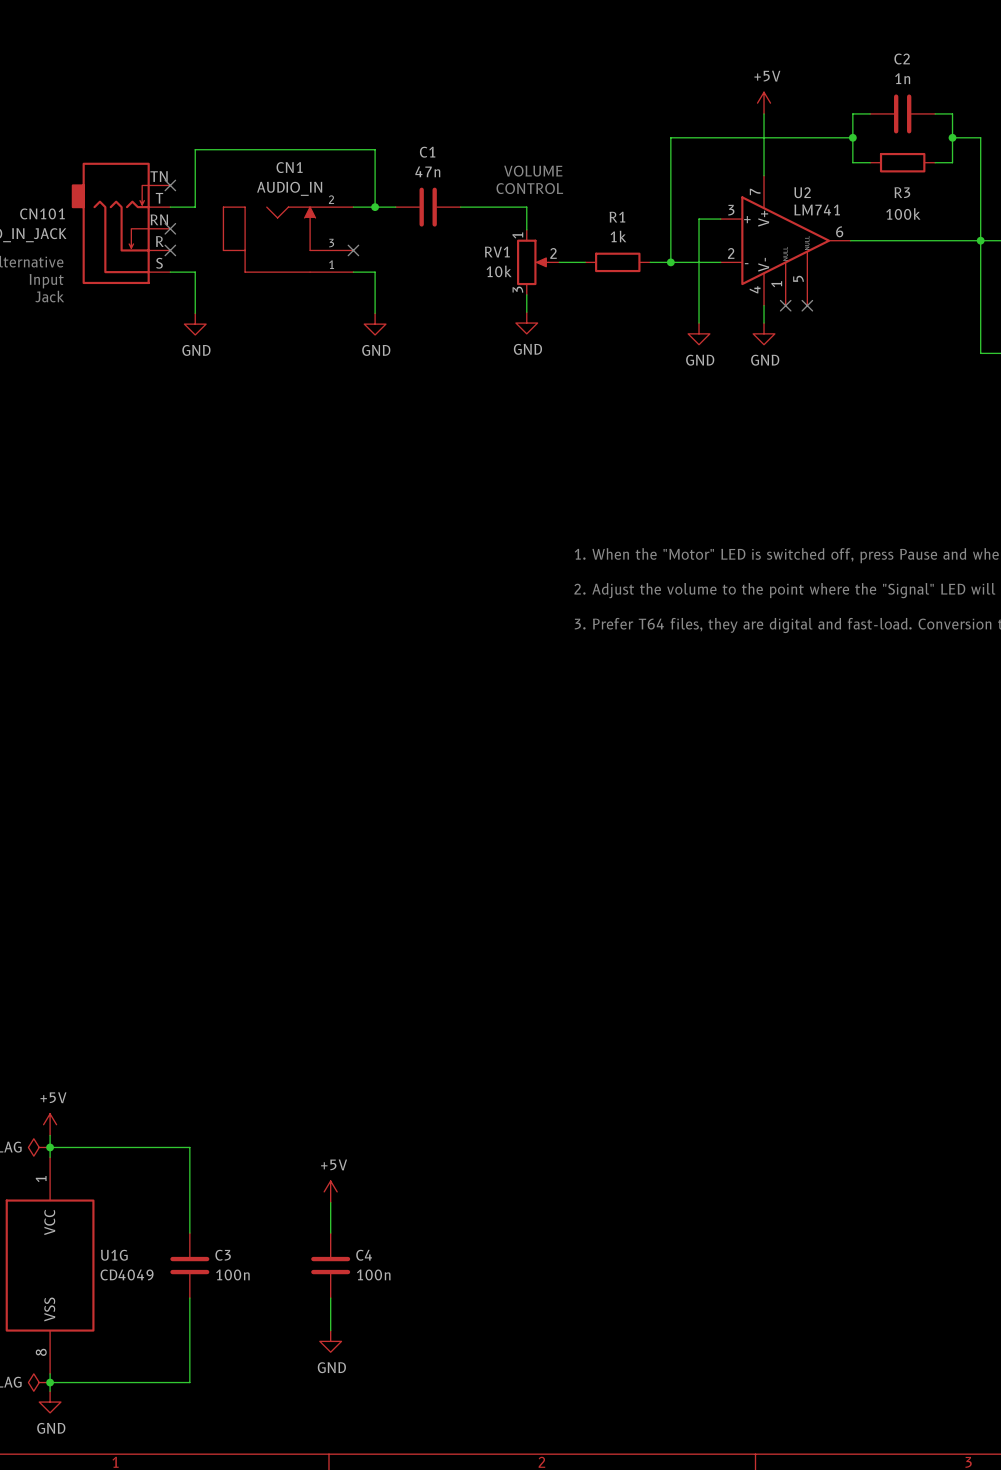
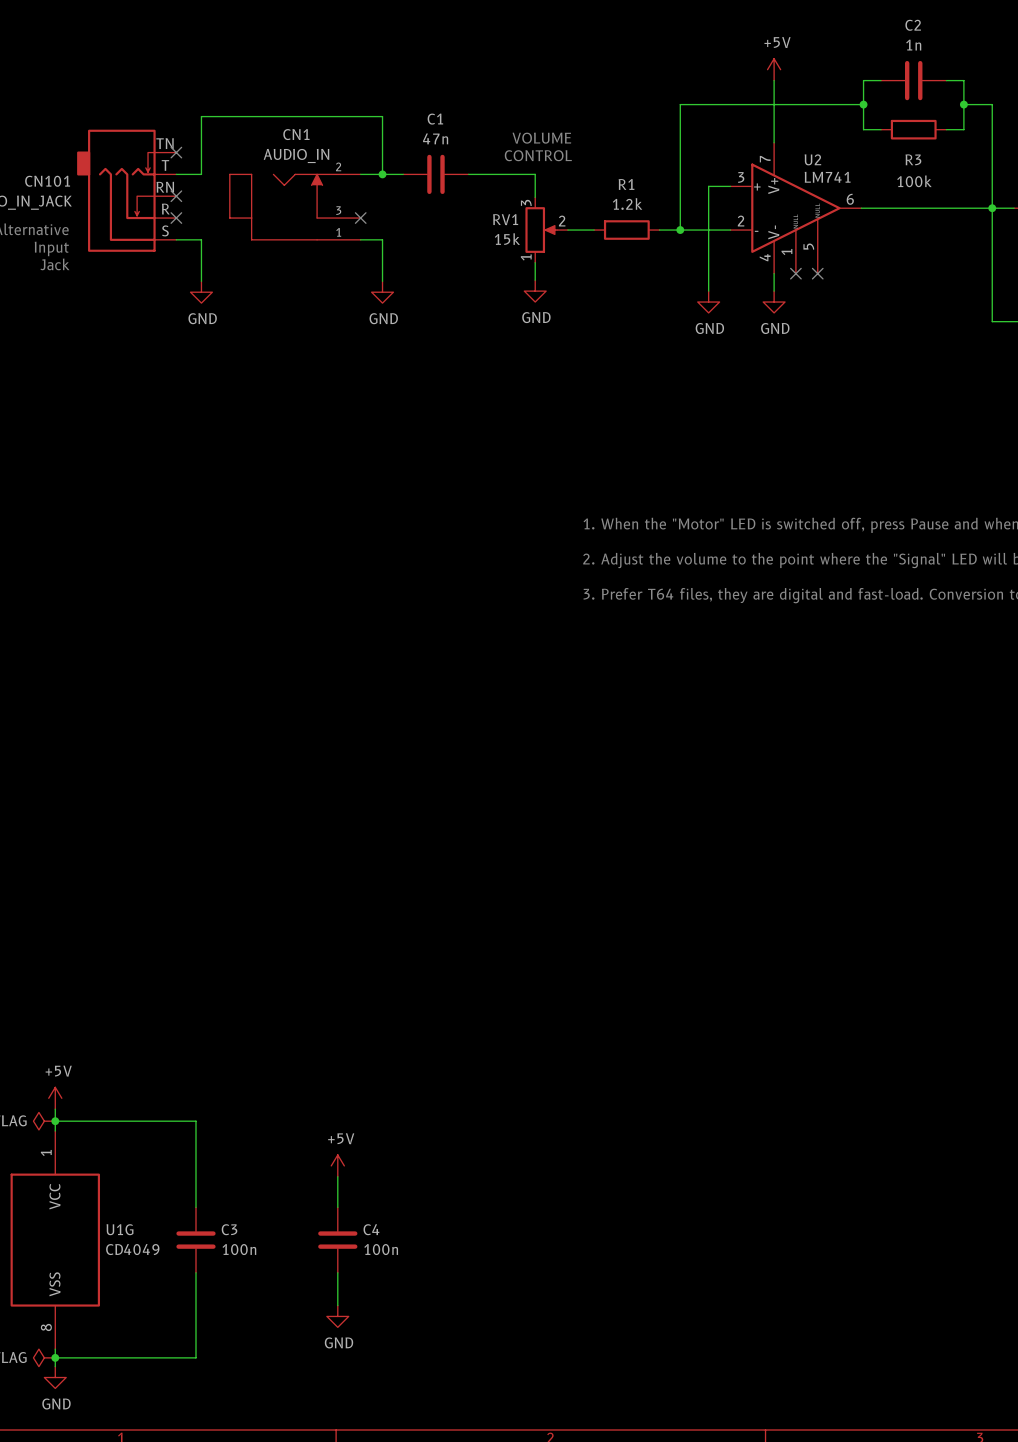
R1 value: 1k (618, 236) -> 1.2k (627, 204)
RV1 flip: as is (532, 262) -> up-down (541, 230)
RV1 value: 10k (499, 271) -> 15k (507, 239)

